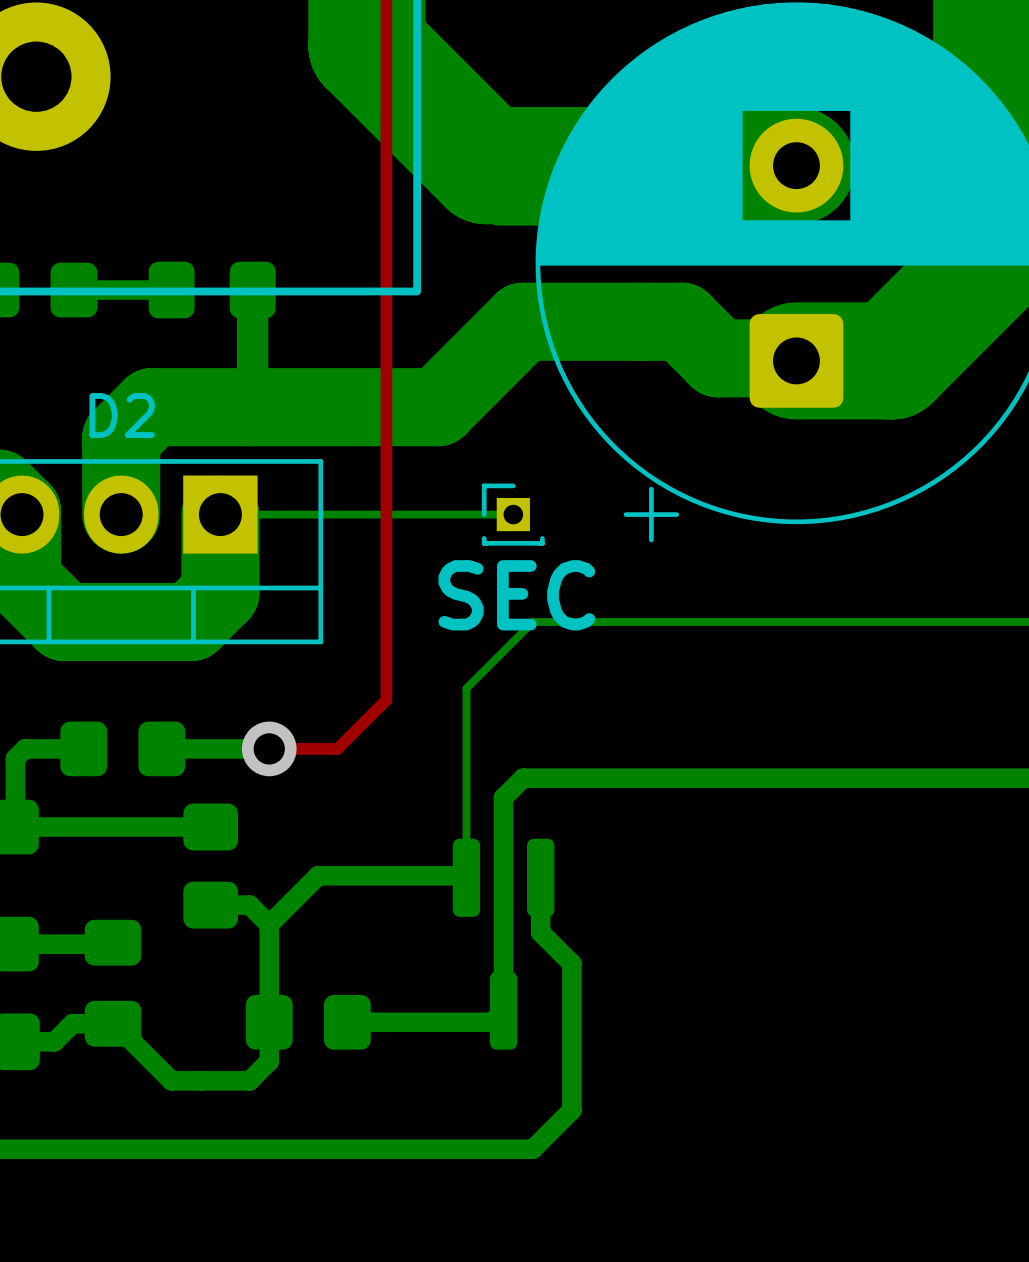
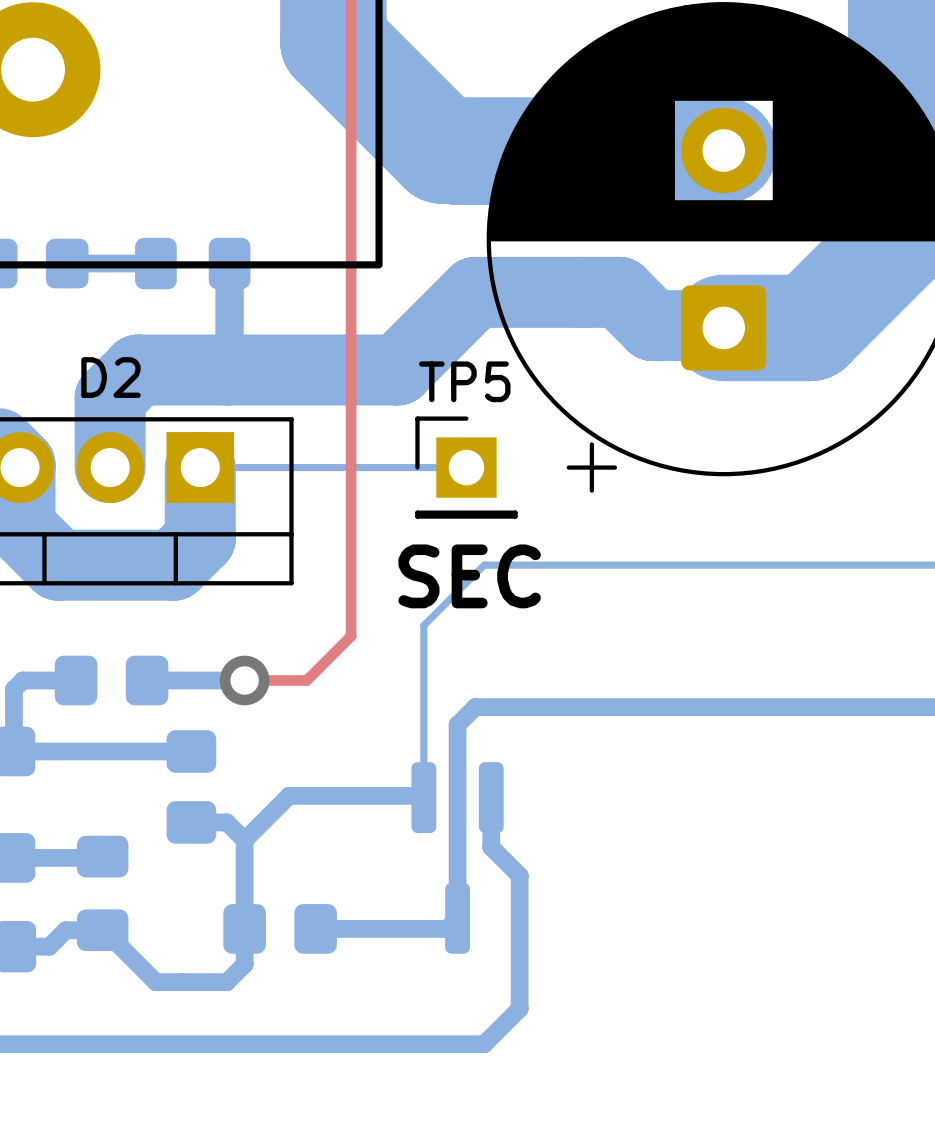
part: (513, 514) -> none
TP5: none -> (466, 467)
text position: SEC (516, 595) -> SEC (469, 576)

